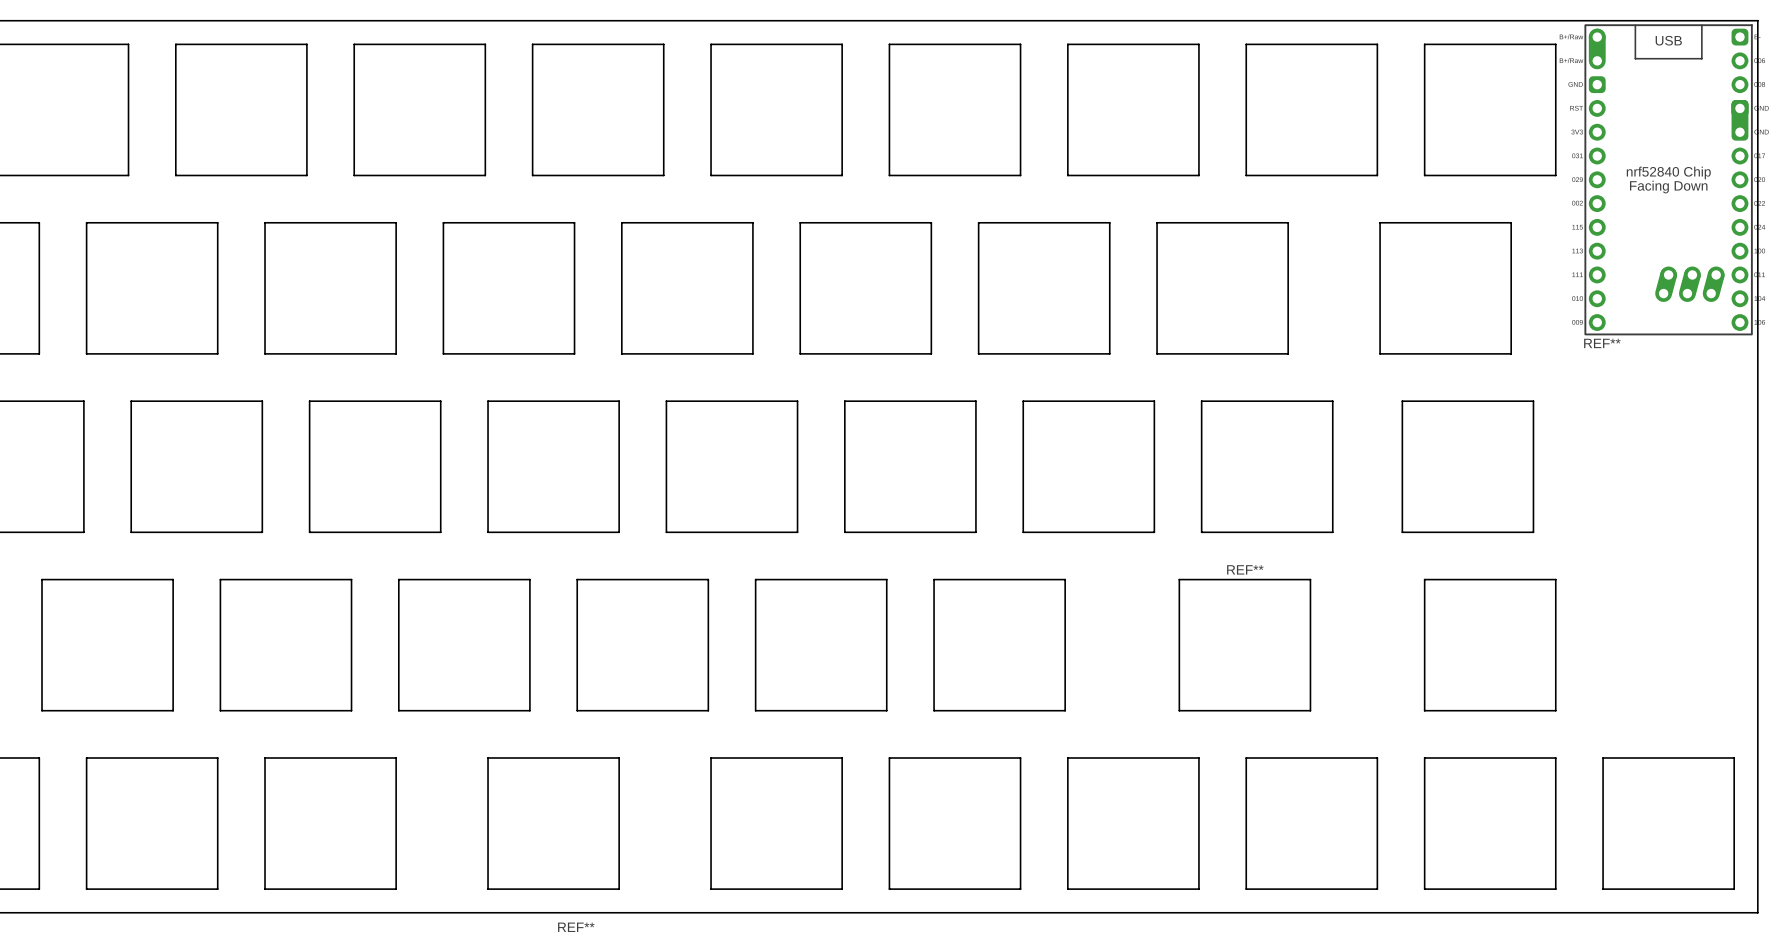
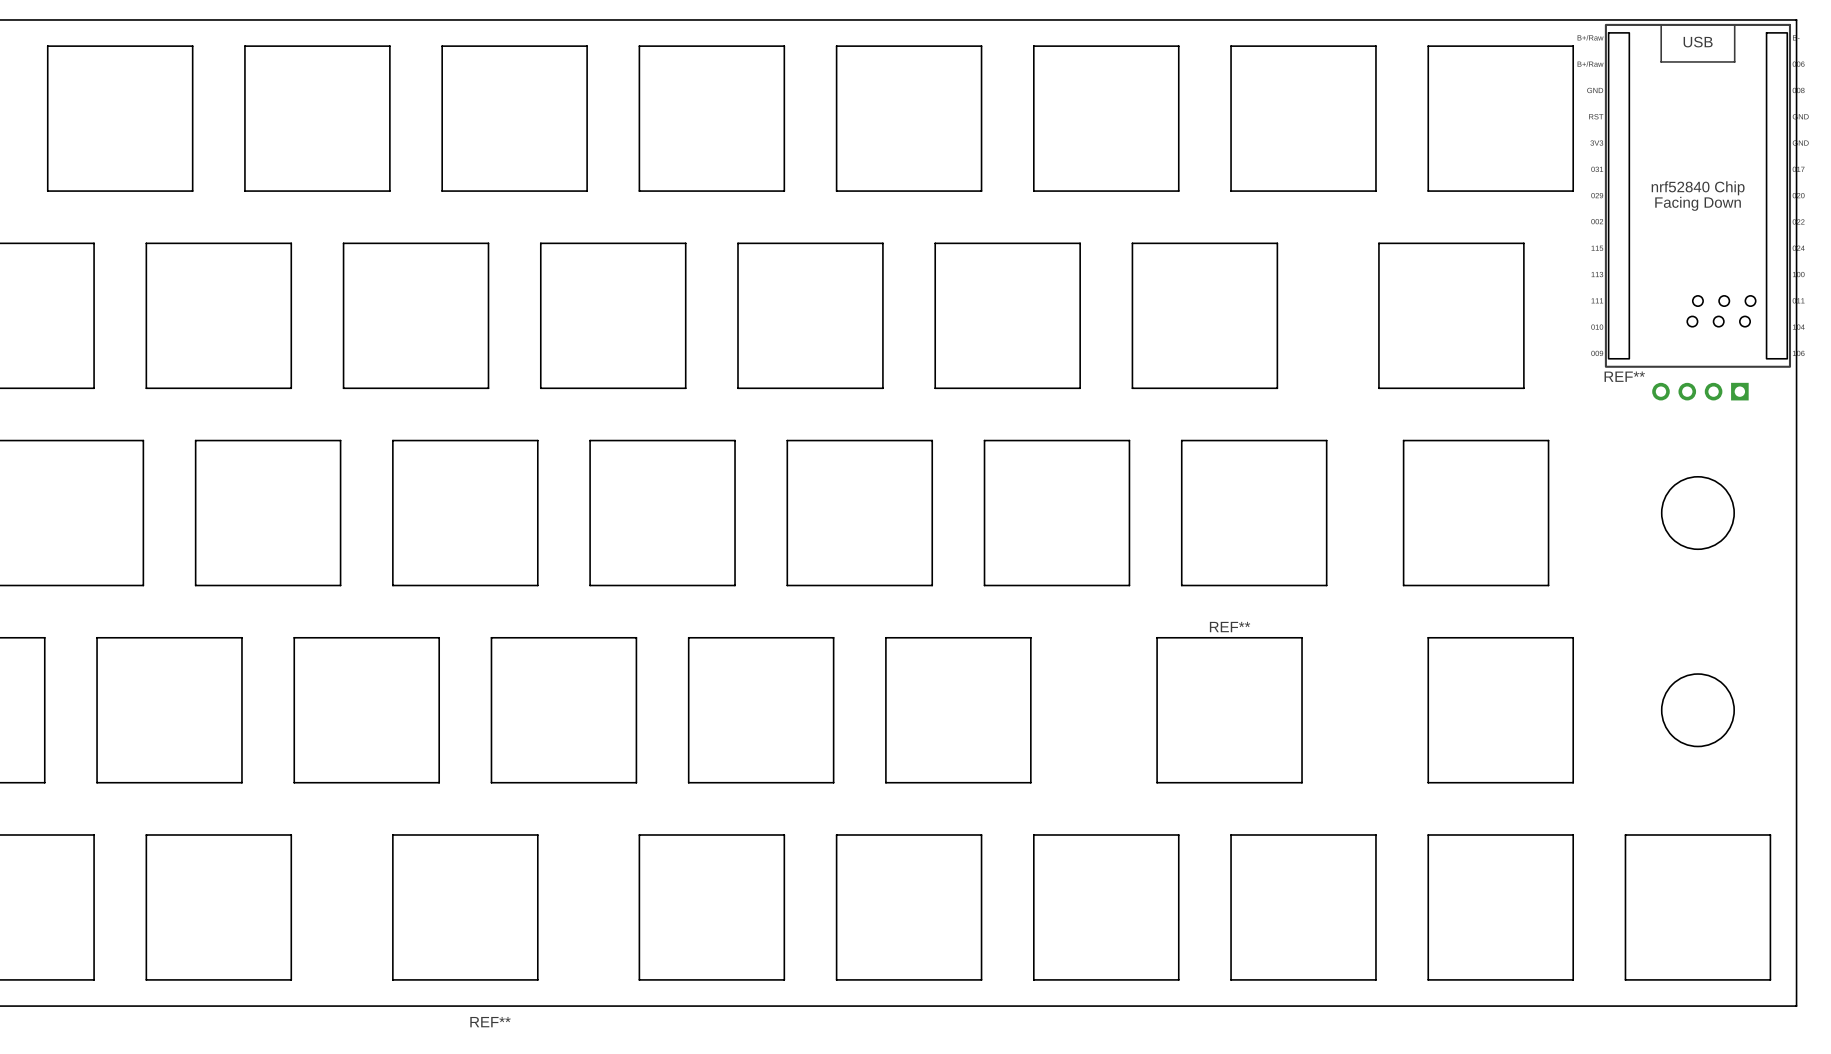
REF** footprint: [1584, 24, 1753, 336] -> [1604, 23, 1792, 368]
part: none -> (1700, 391)
round board edge: none -> [1661, 476, 1735, 550]
round board edge: none -> [1661, 673, 1735, 747]

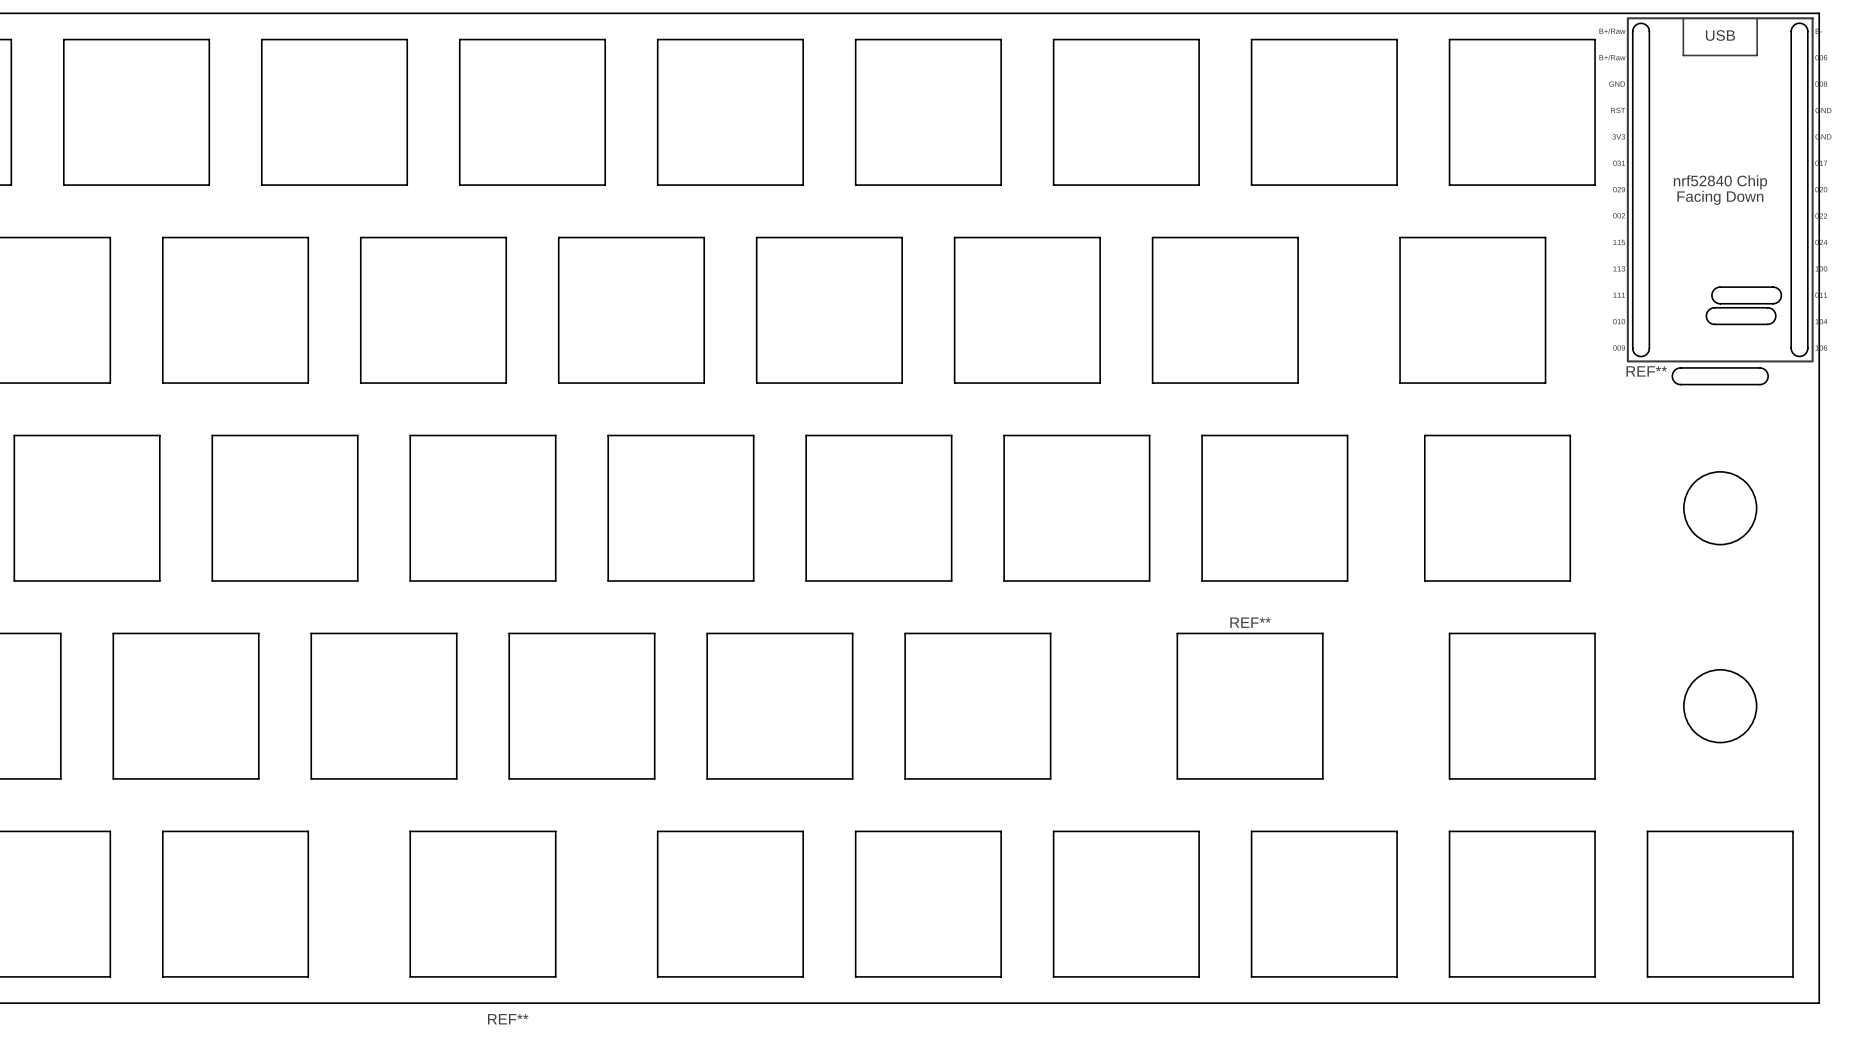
REF** footprint: [1604, 23, 1792, 368] -> [1626, 17, 1814, 363]
drawing: none -> [1672, 367, 1769, 385]
part: (1700, 391) -> none

